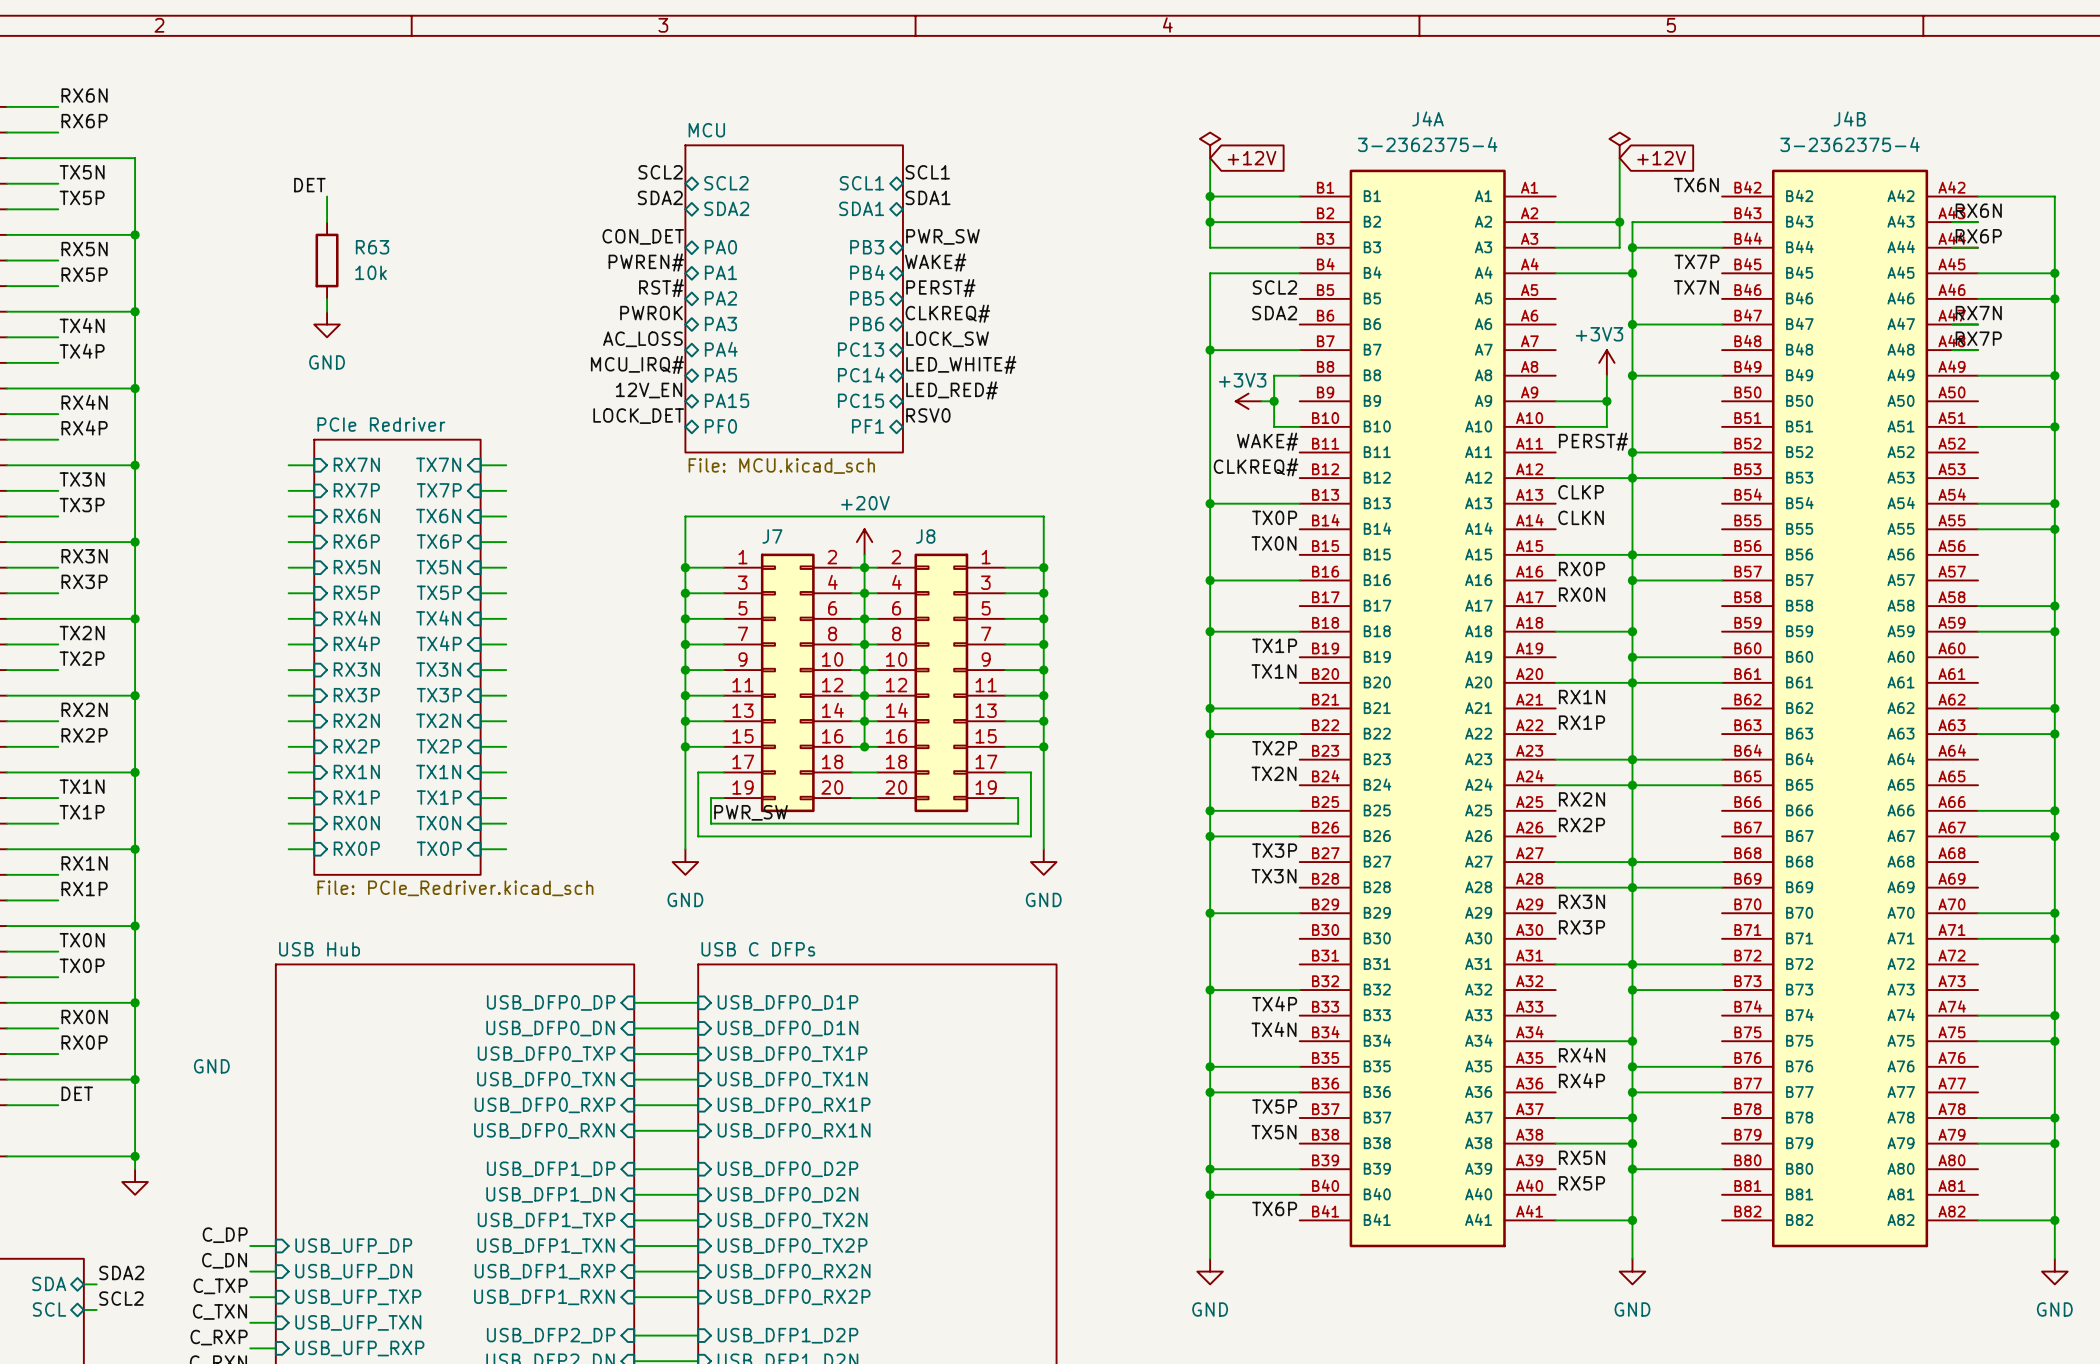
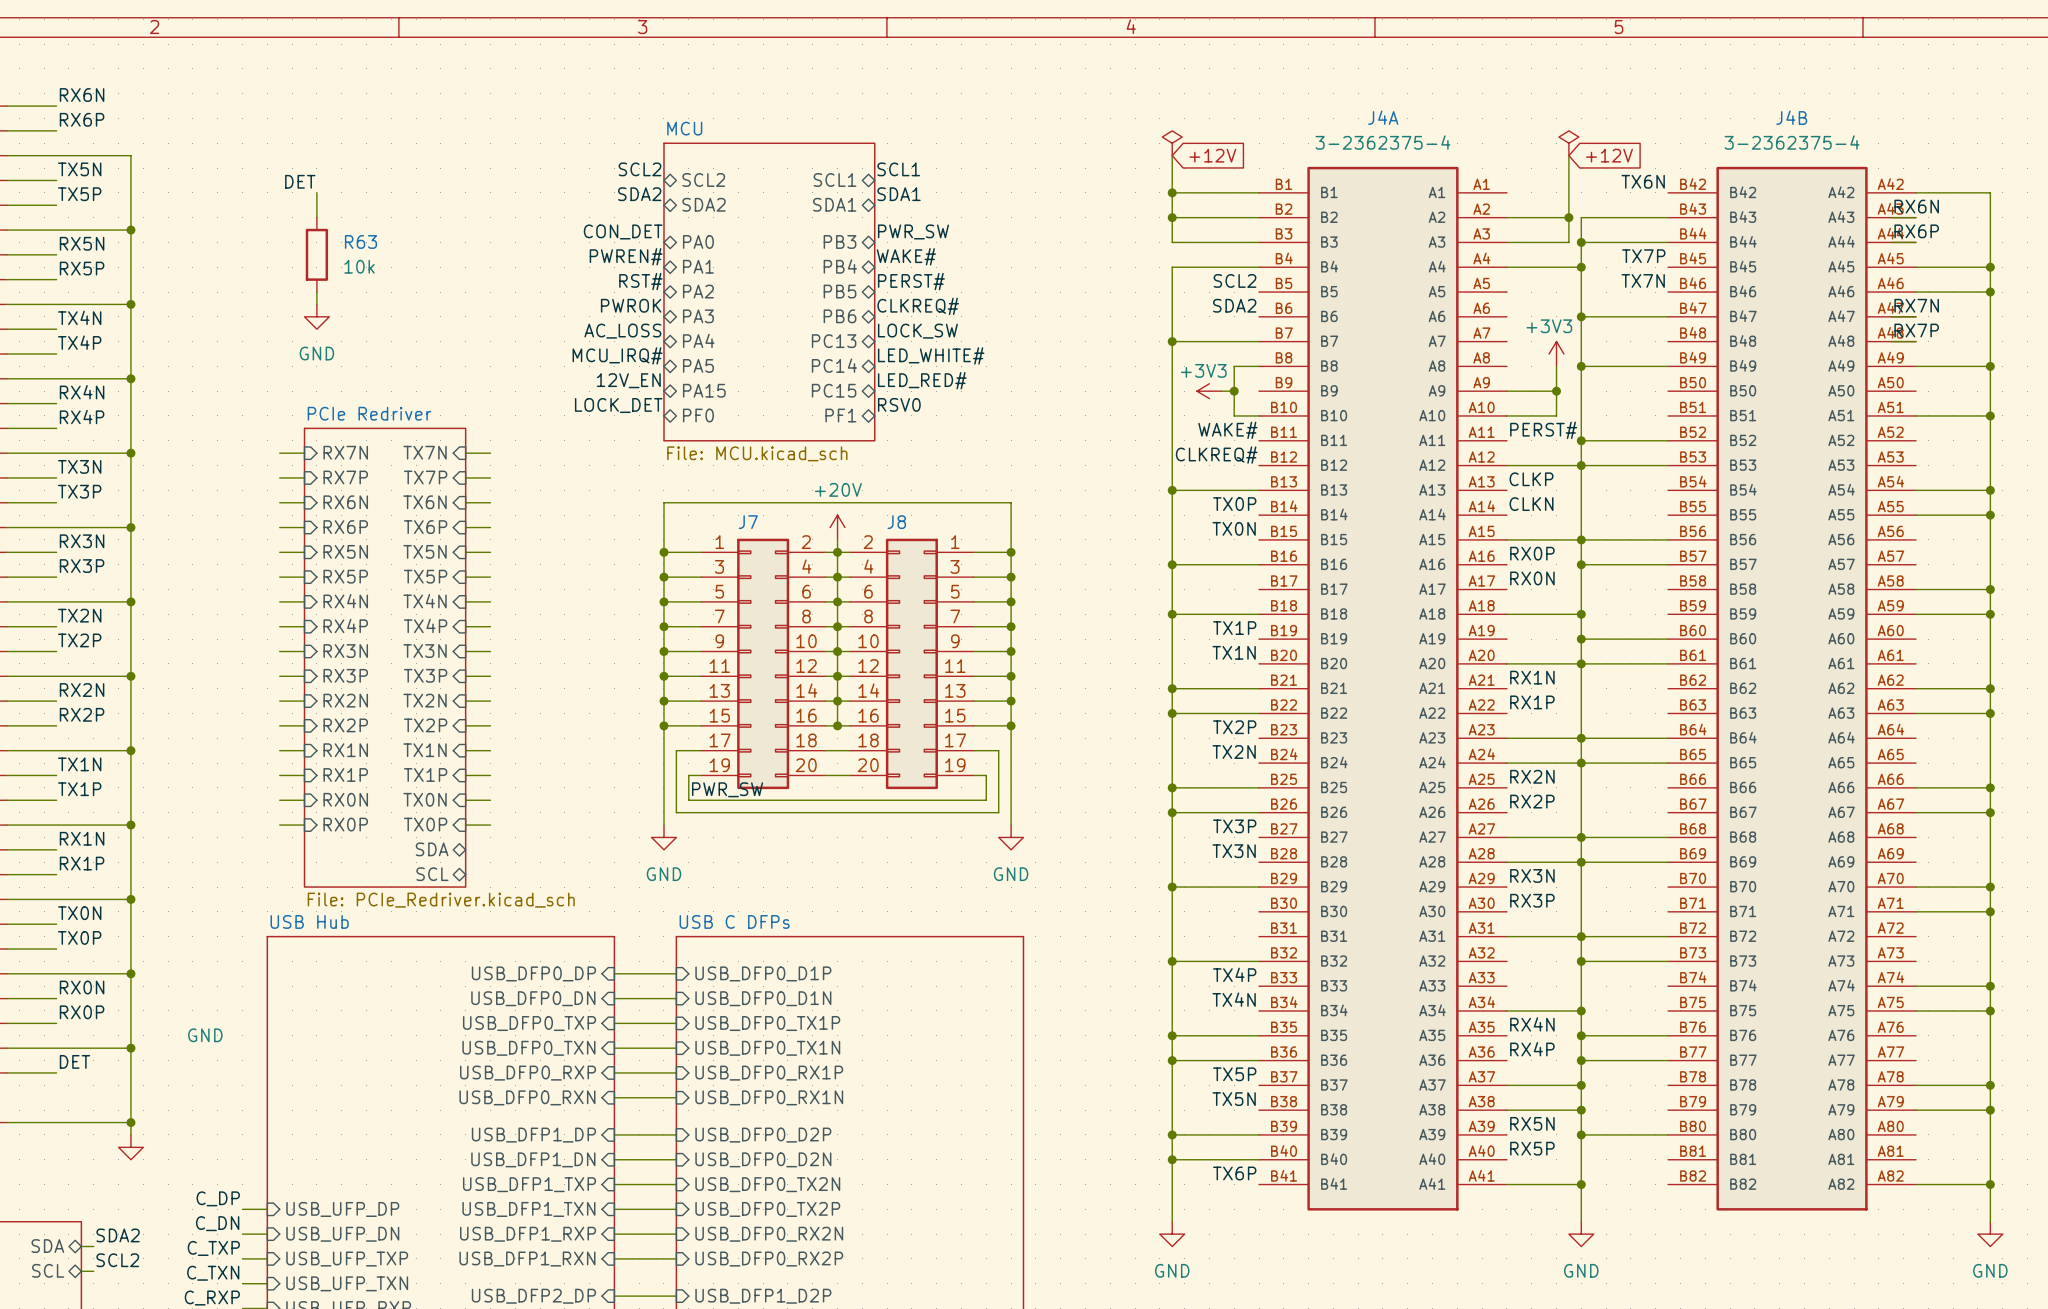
sheet PCIe Redriver: File: PCIe_Redriver.kicad_sch (397, 657) -> none
sheet PCIe Redriver: none -> File: PCIe_Redriver.kicad_sch (385, 657)
sheet pin: none -> SDA (432, 849)
sheet pin: none -> SCL (432, 874)

